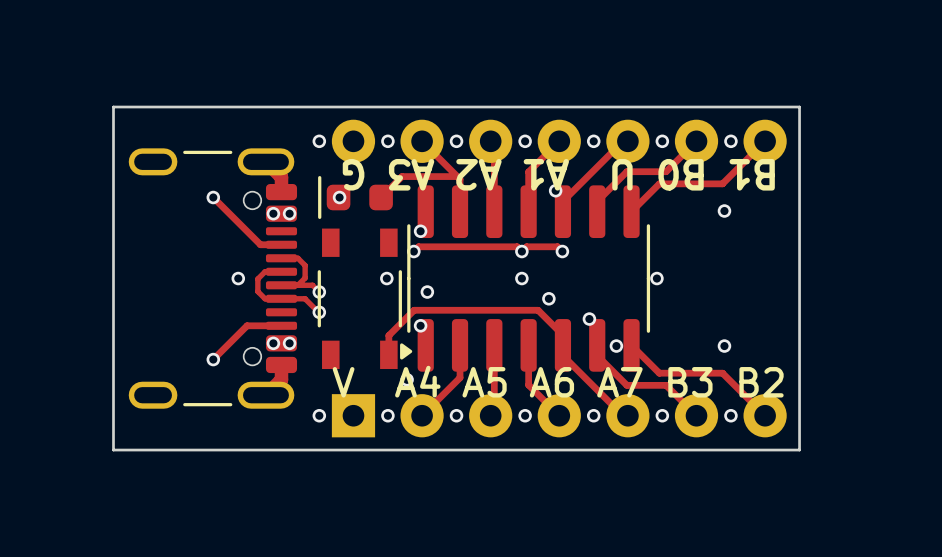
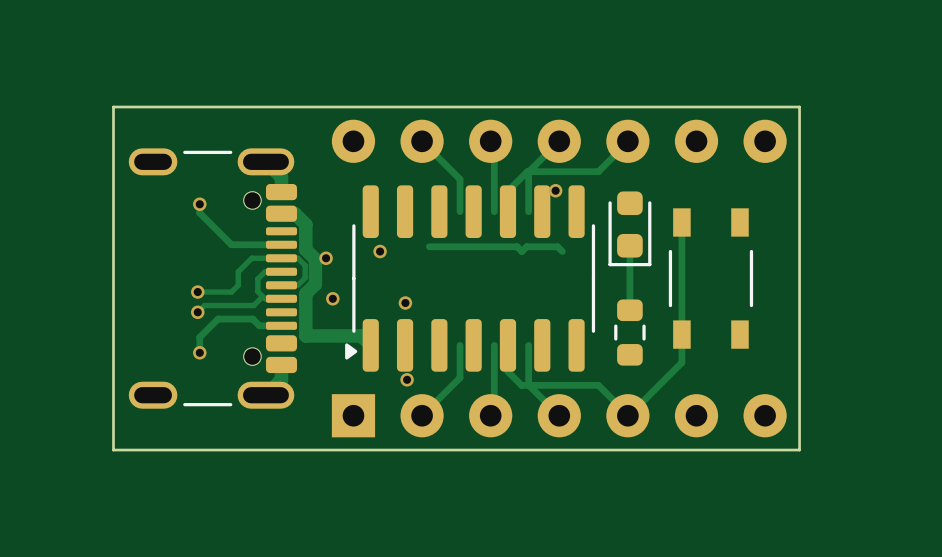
via: (319, 141) -> none
via: (387, 141) -> none
via: (456, 141) -> none
via: (525, 141) -> none
via: (593, 141) -> none
track: (627, 141) (623, 141) (562, 201) (562, 211) -> (628, 141) (598, 171) (527, 171) (507, 191) (507, 211)
via: (662, 141) -> none
track: (696, 141) (666, 171) (626, 171) (597, 201) (597, 211) -> none
via: (730, 141) -> none
track: (765, 141) (722, 183) (659, 183) (631, 211) -> none
text: B1 B0 U A1 A2 A3 G (558, 174) -> none
track: (457, 176) (402, 176) (381, 197) -> none
track: (213, 197) (260, 244) -> (199, 204) (199, 213) (231, 244) (260, 244)
via position: (213, 197) -> (199, 204)
via: (339, 197) -> none
part: (355, 197) -> none
via: (724, 211) -> none
via: (273, 213) -> none
track: none -> (276, 213) (294, 213) (305, 224) (305, 249) (315, 259) (315, 284) (305, 293) (305, 335) (361, 335) (370, 345)
via: (289, 213) -> none
track: none -> (681, 222) (681, 362) (628, 415) (598, 385) (521, 385) (507, 371) (507, 345)
part: none -> (629, 228)
via: (420, 231) -> none
track: none -> (629, 245) (629, 310)
track: (429, 246) (418, 246) (413, 251) -> none
via: none -> (380, 251)
via: (413, 251) -> none
via: (521, 251) -> none
via: (562, 251) -> none
track: none -> (281, 258) (251, 258) (238, 271) (238, 285) (231, 292) (197, 292)
via: none -> (326, 258)
via: (238, 278) -> none
via: (386, 278) -> none
via: (521, 278) -> none
part position: (525, 278) -> (470, 278)
via: (656, 278) -> none
track: (293, 285) (312, 285) (319, 292) -> none
via: none -> (197, 292)
via: (319, 292) -> none
via: (427, 292) -> none
track: none -> (260, 298) (253, 305) (204, 305) (197, 312)
track: (276, 298) (305, 298) (319, 312) -> none
via: none -> (332, 298)
part position: (359, 298) -> (710, 278)
via: (548, 298) -> none
via: none -> (405, 303)
via: none -> (197, 312)
via: (319, 312) -> none
via: (589, 319) -> none
track: (259, 325) (247, 325) (213, 359) -> (259, 325) (252, 319) (218, 319) (199, 337) (199, 352)
via: (420, 325) -> none
part: none -> (629, 332)
via: (273, 343) -> none
via: (289, 343) -> none
track: (597, 345) (597, 355) (626, 385) (666, 385) (696, 415) -> none
track: (631, 345) (659, 373) (722, 373) (765, 415) -> none
via: (616, 346) -> none
via: (724, 346) -> none
track: (388, 354) (388, 335) (414, 310) (538, 310) (562, 335) (562, 355) (623, 415) (627, 415) -> none
via position: (213, 359) -> (199, 352)
text: V A4 A5 A6 A7 B3 B2 (558, 381) -> none
via: (319, 415) -> none
via: (387, 415) -> none
via: (456, 415) -> none
via: (525, 415) -> none
via: (593, 415) -> none
via: (662, 415) -> none
via: (730, 415) -> none

